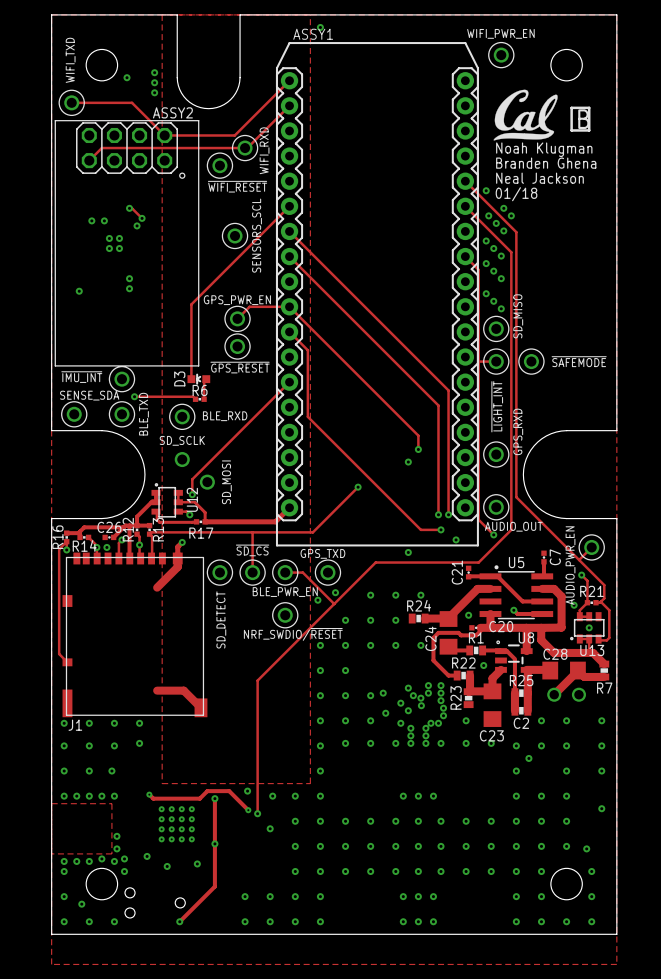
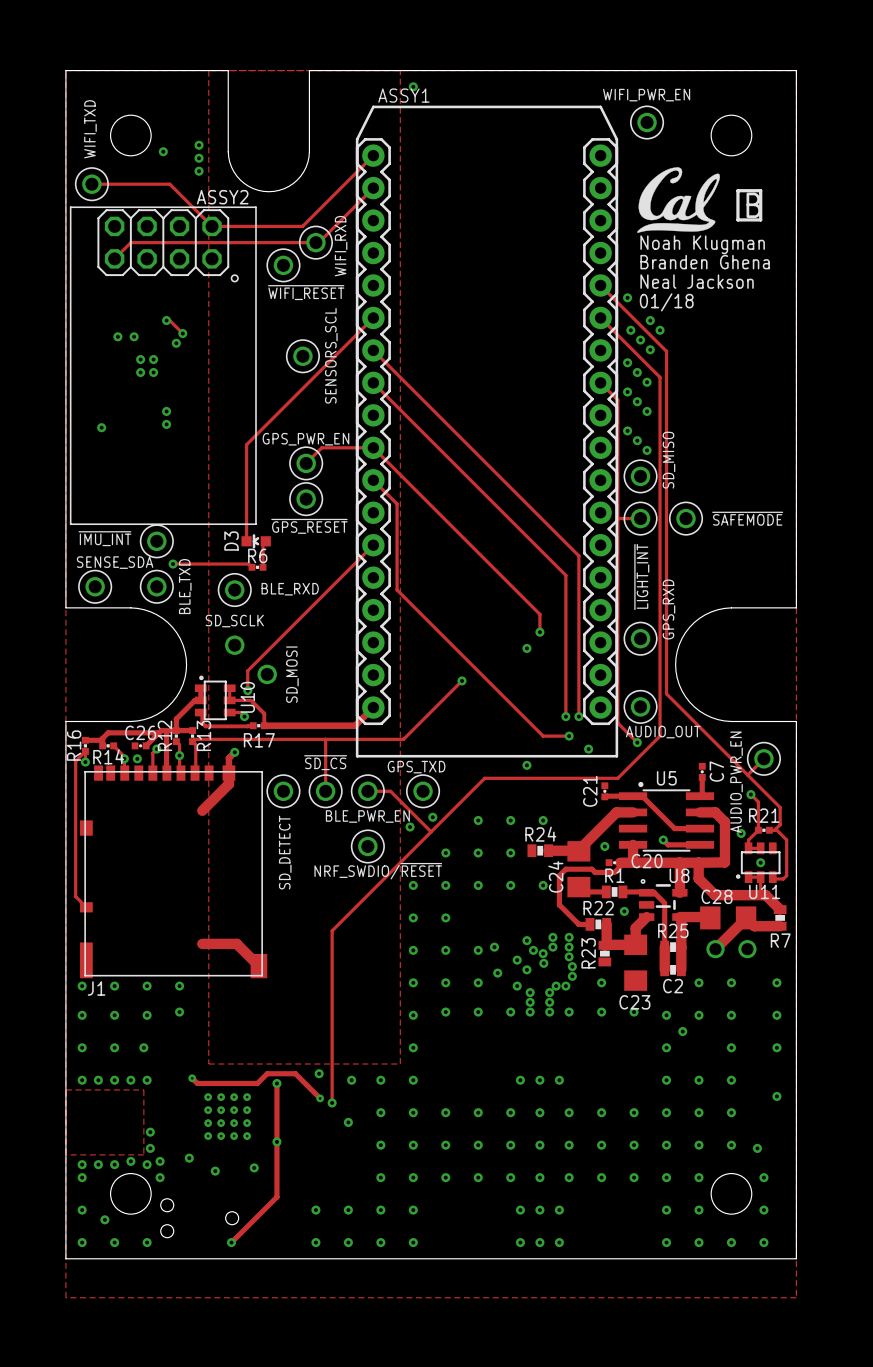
U12 name: U12 (192, 499) -> U10 (247, 697)
U13 name: U13 (592, 650) -> U11 (764, 891)

